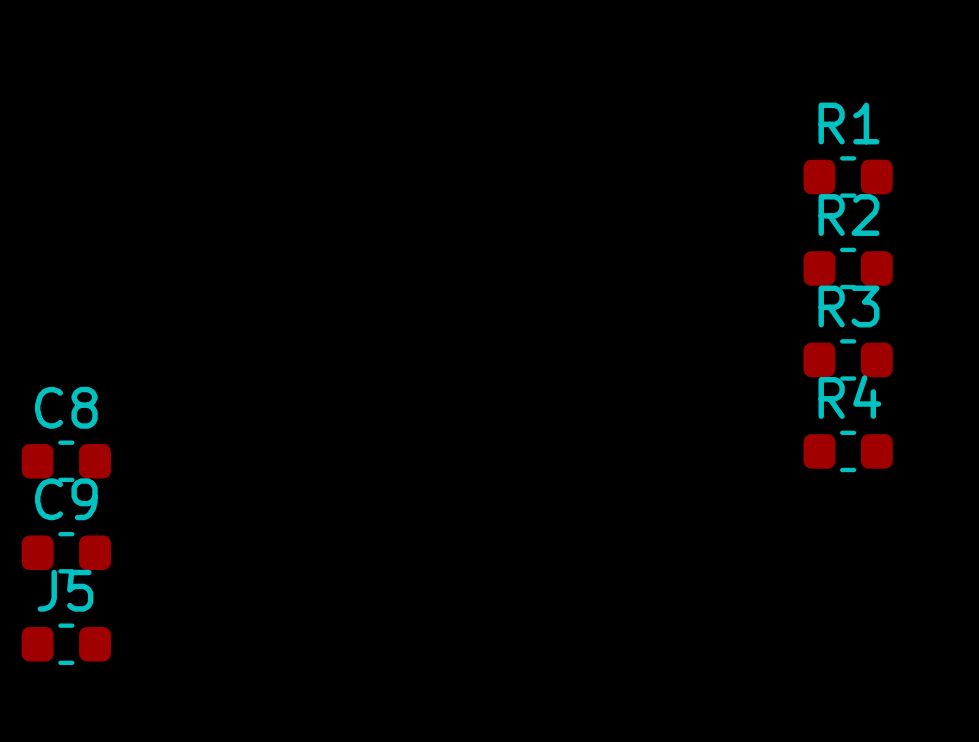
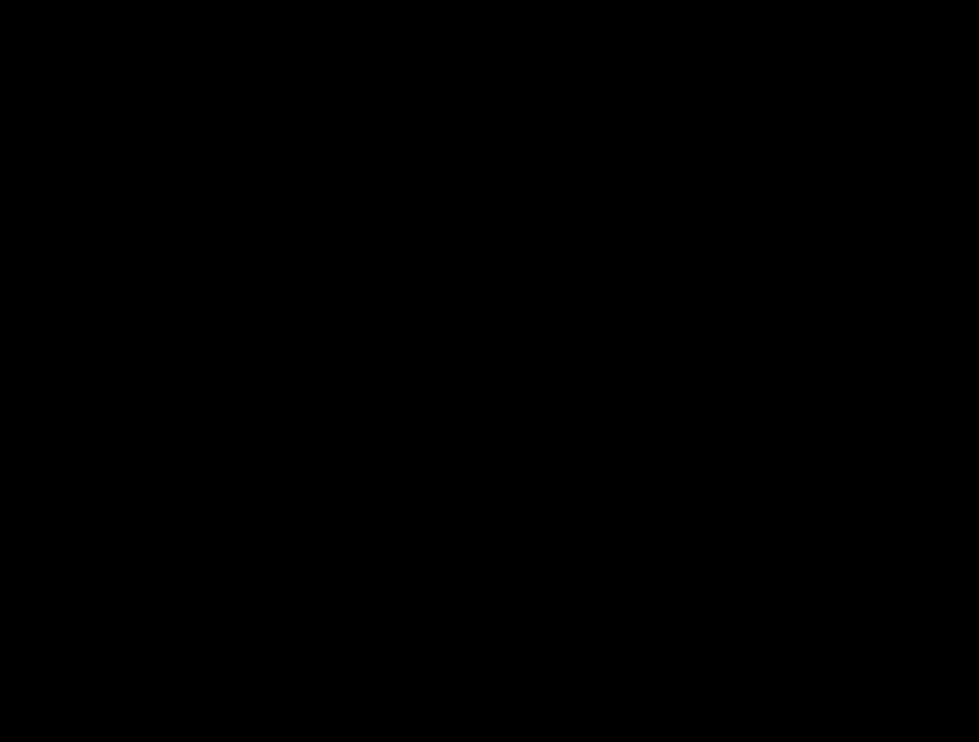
R1: (848, 176) -> none
R2: (848, 268) -> none
R3: (848, 359) -> none
R4: (848, 451) -> none
C8: (66, 461) -> none
C9: (66, 552) -> none
J5: (66, 644) -> none

